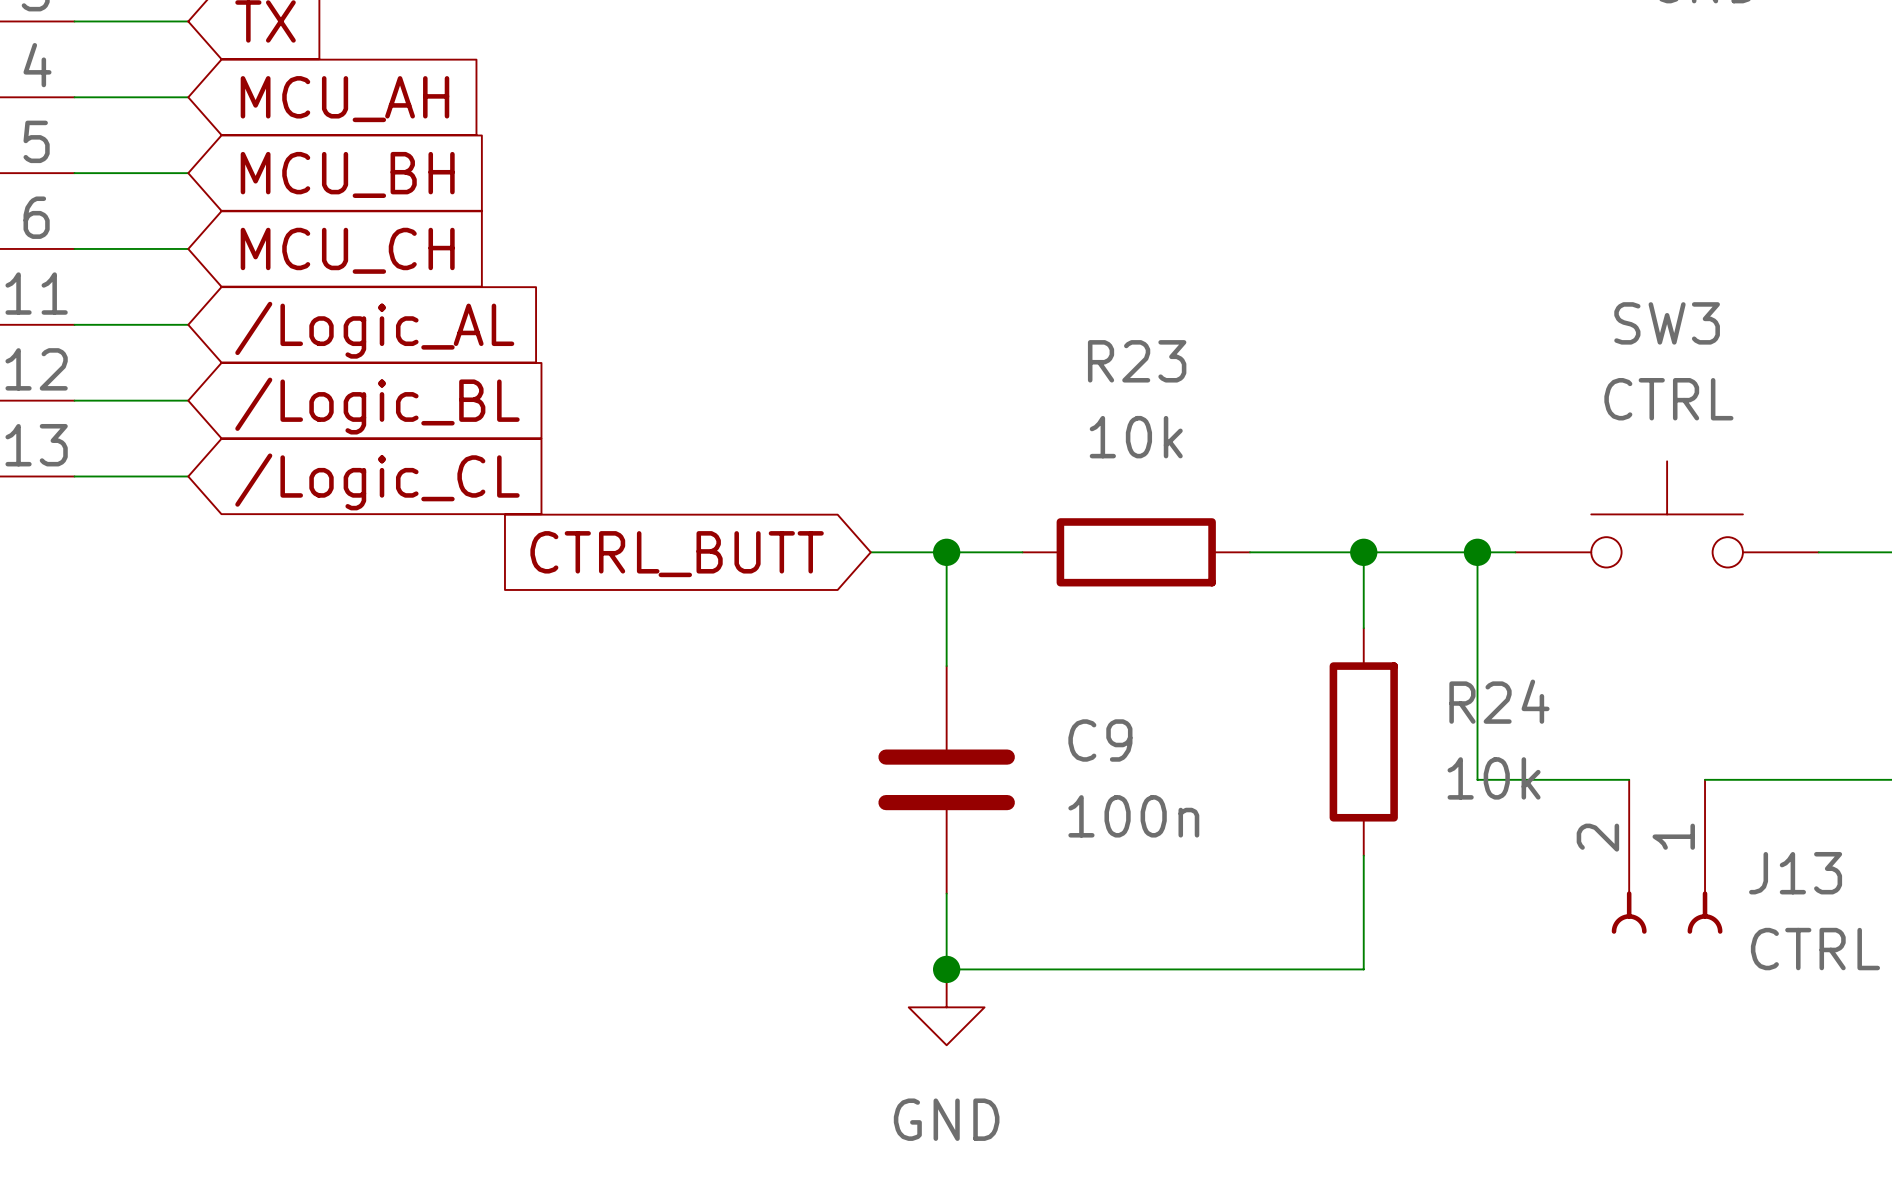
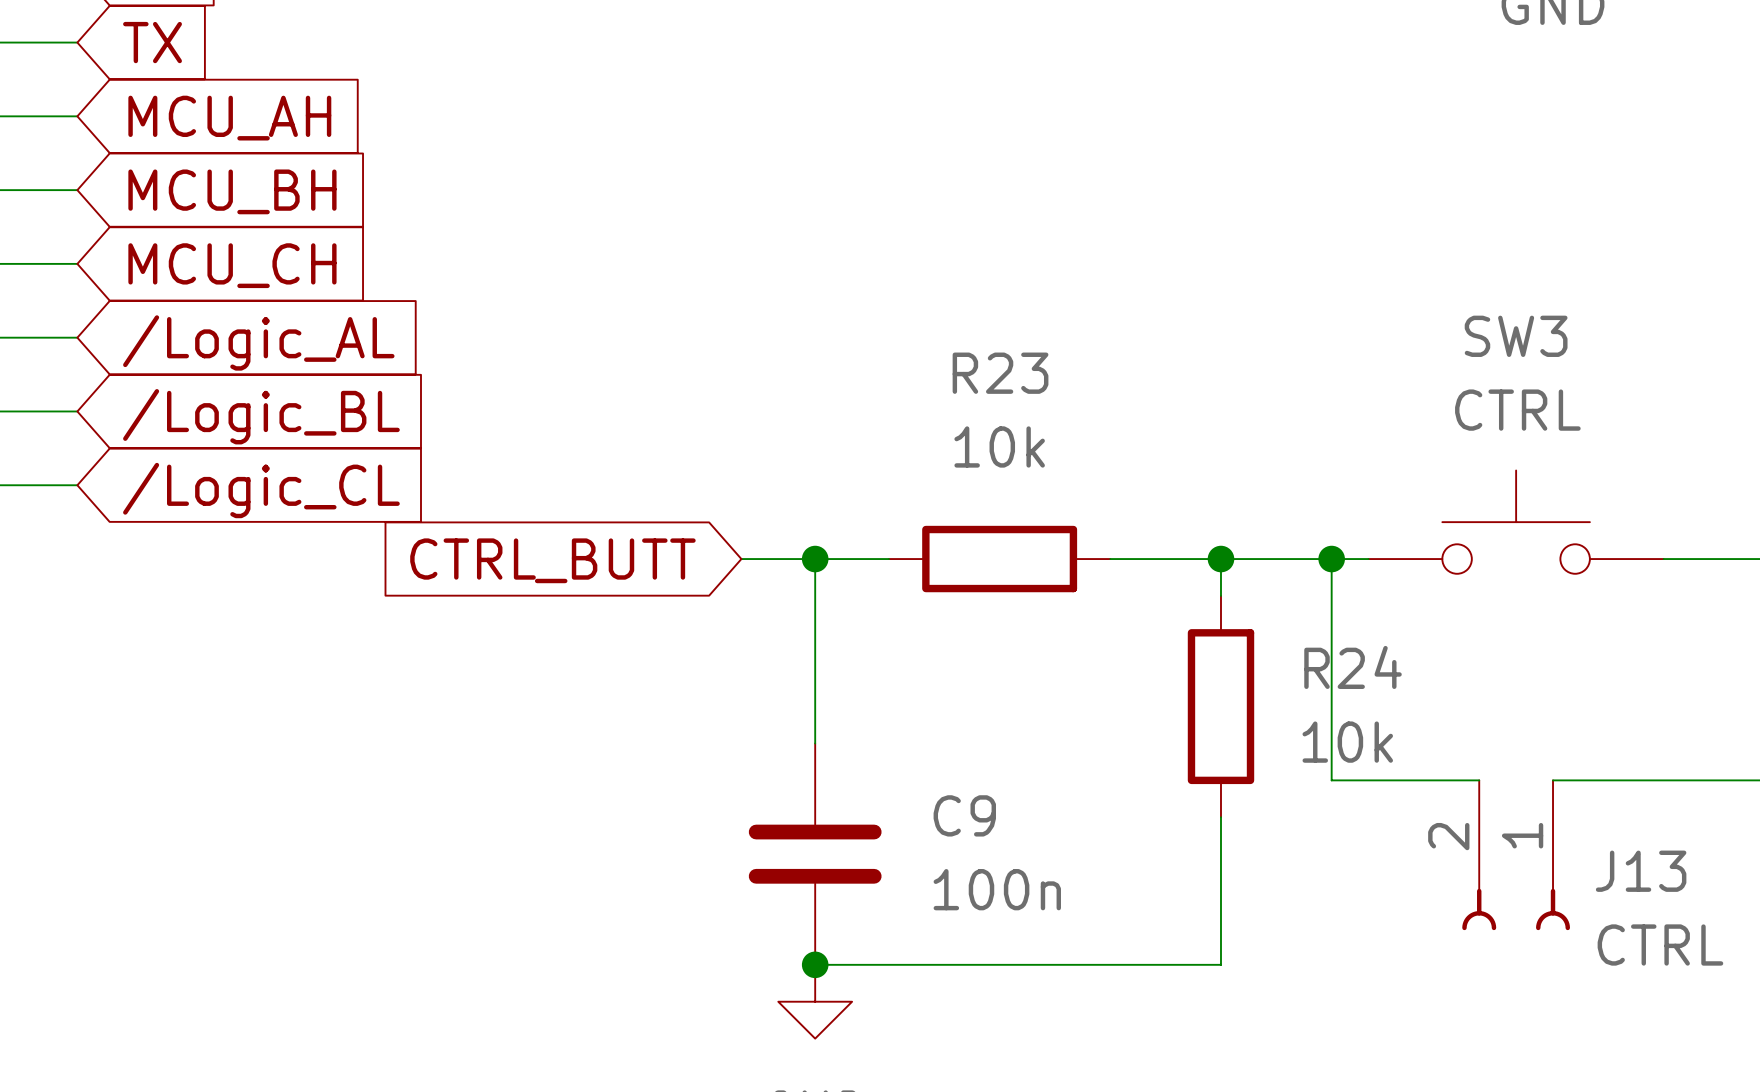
R24 position: (1363, 741) -> (1220, 706)
C9 position: (946, 779) -> (815, 854)

